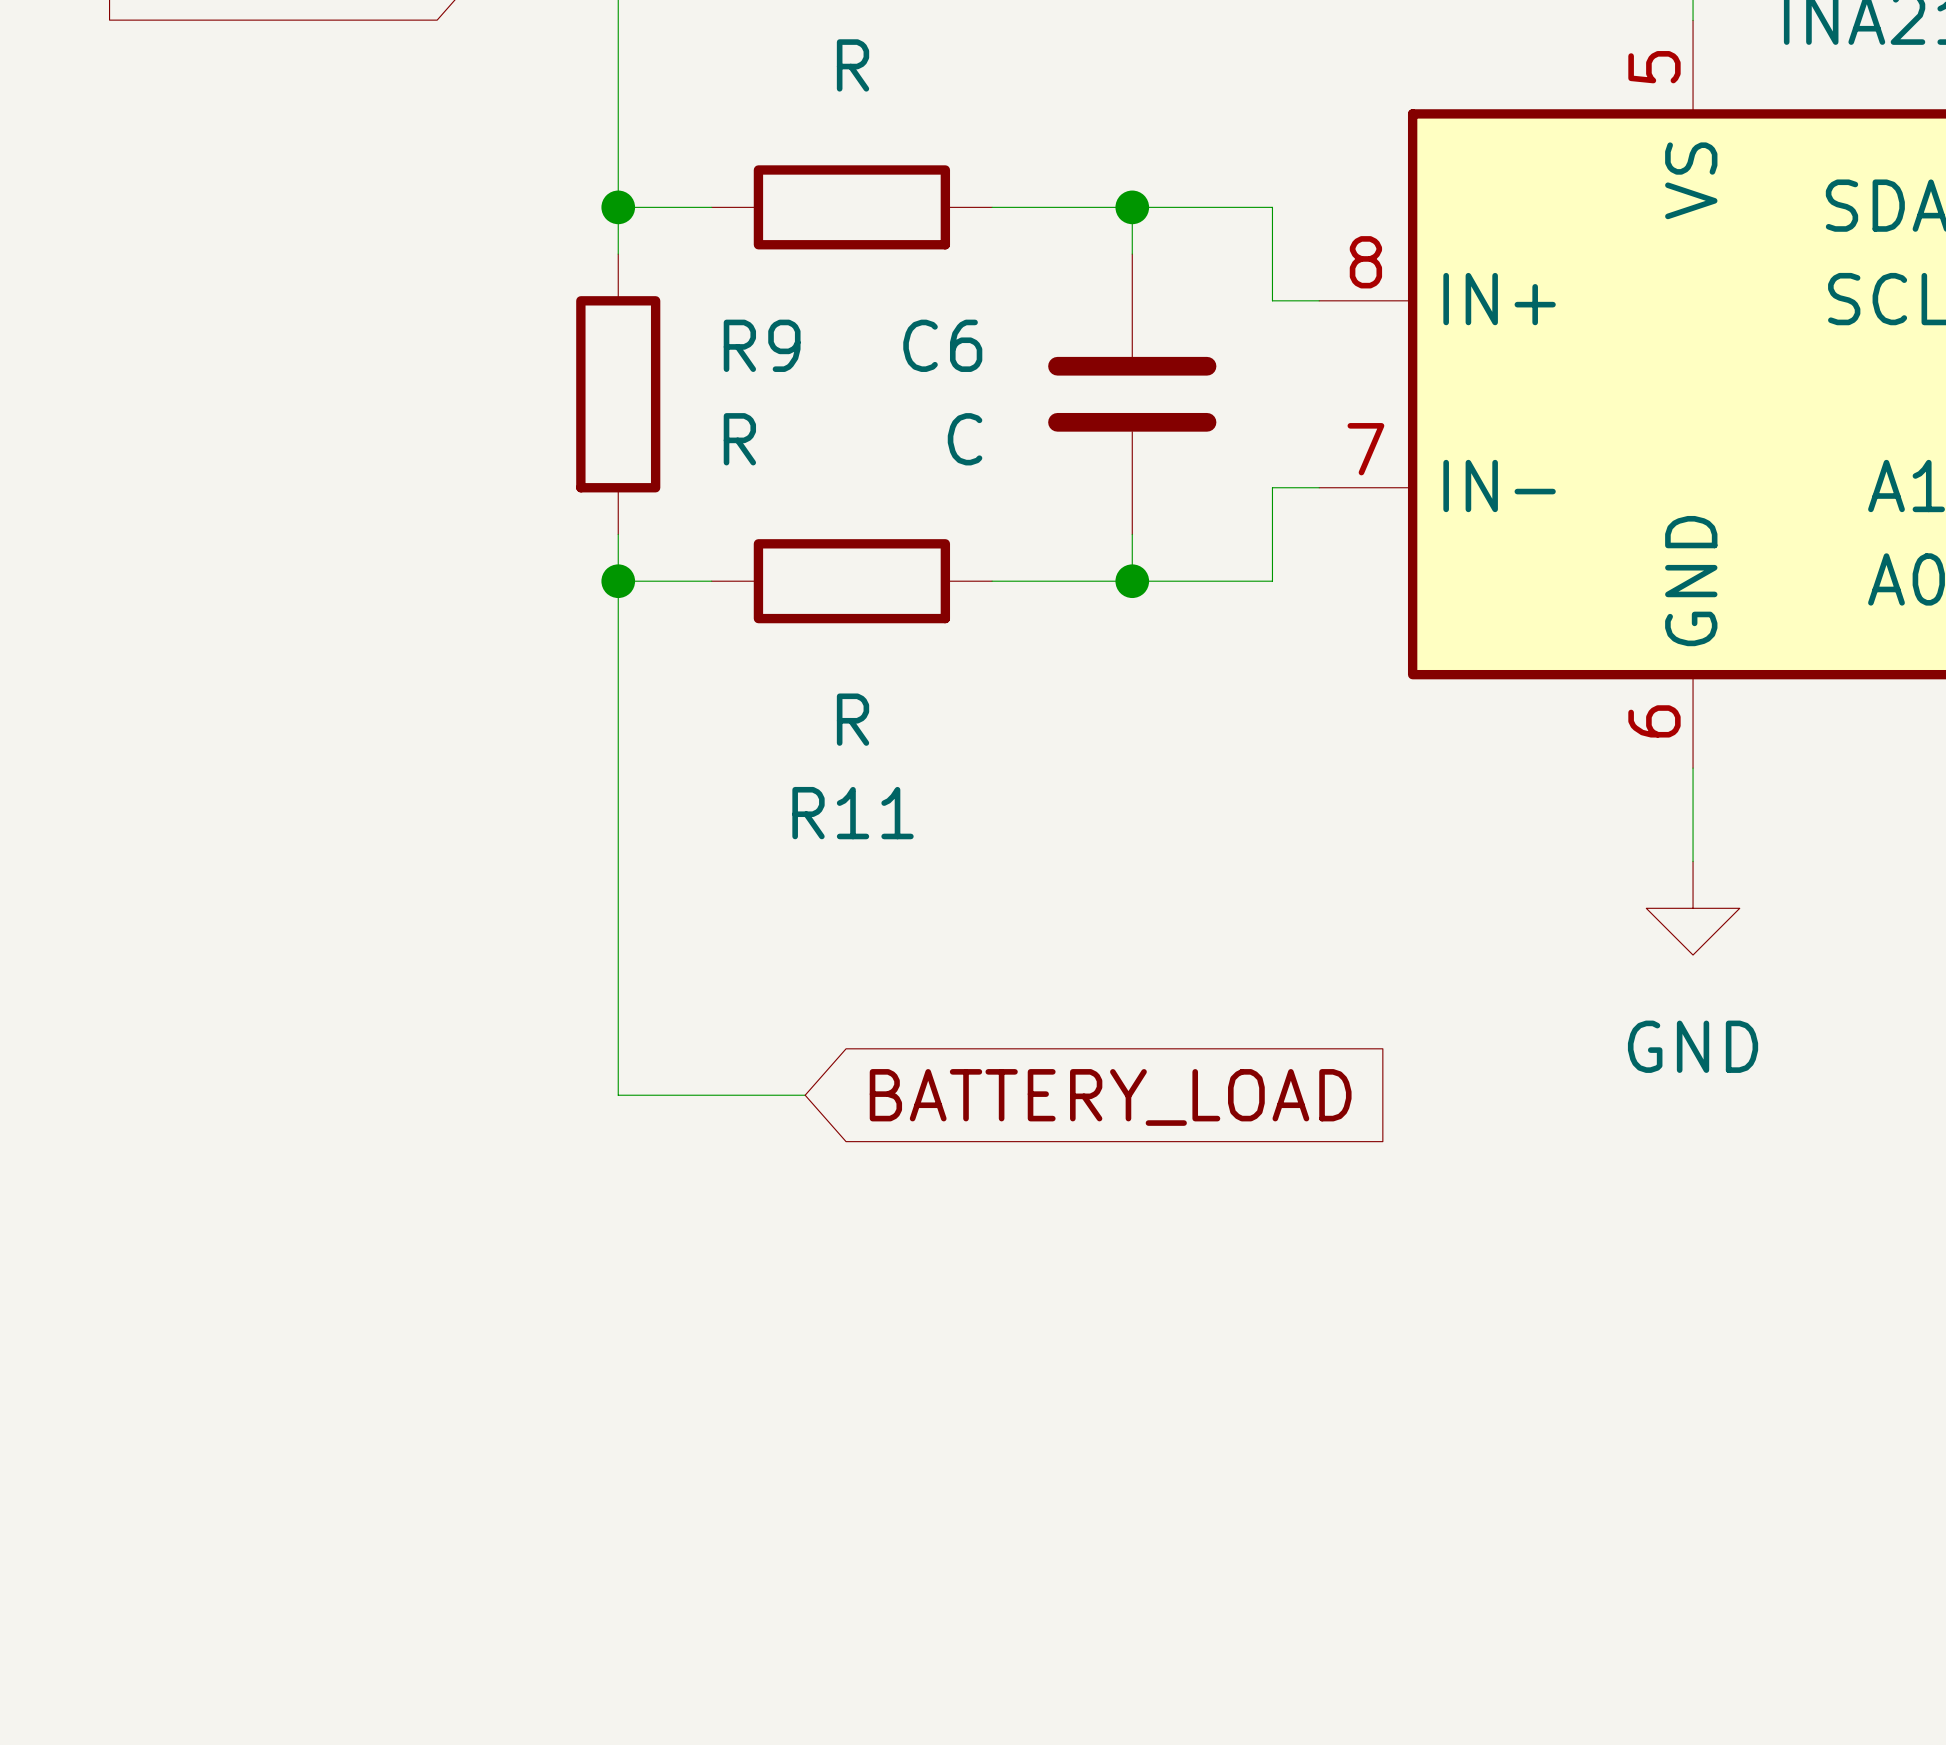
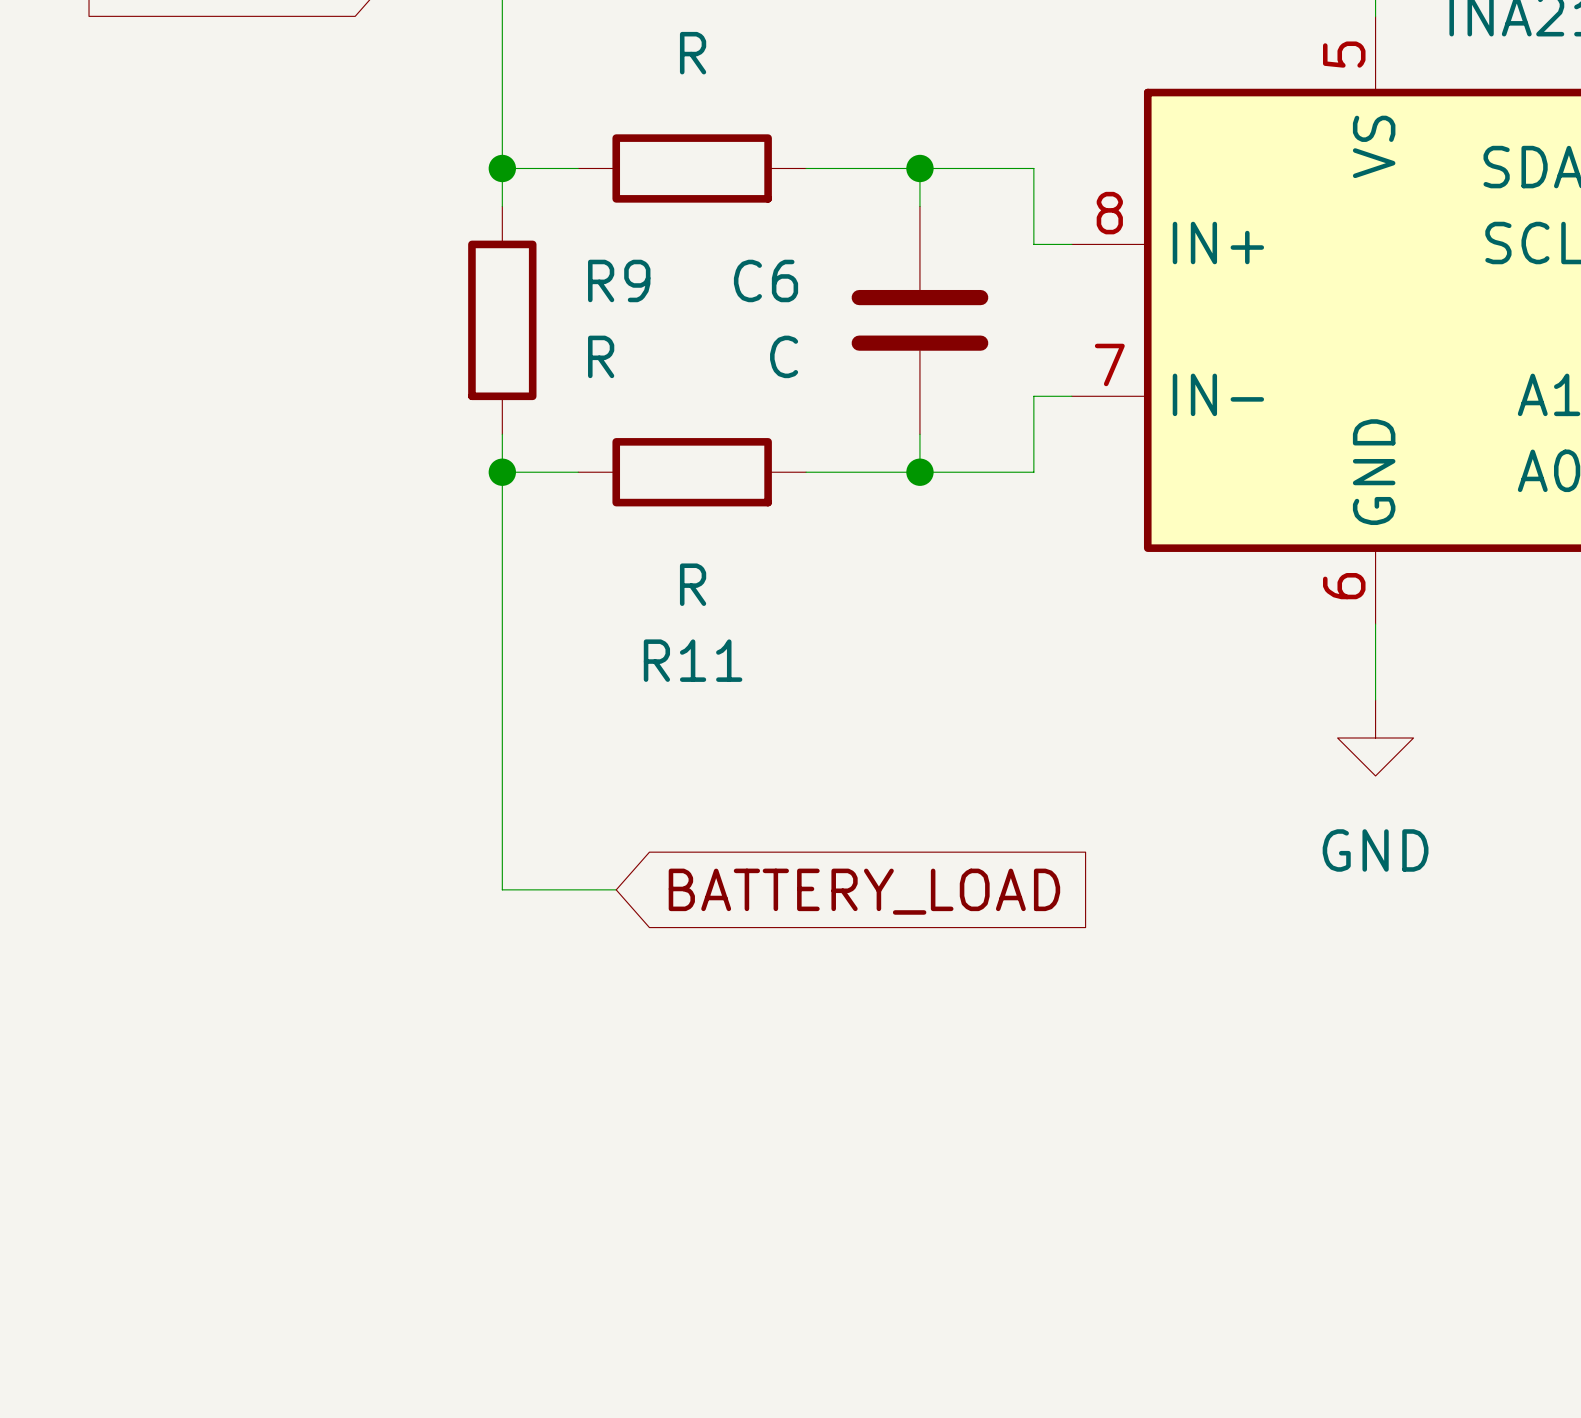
wire: (758, 1095) (805, 1095) -> none
global label position: BATTERY_LOAD (1110, 1097) -> BATTERY_LOAD (864, 891)

